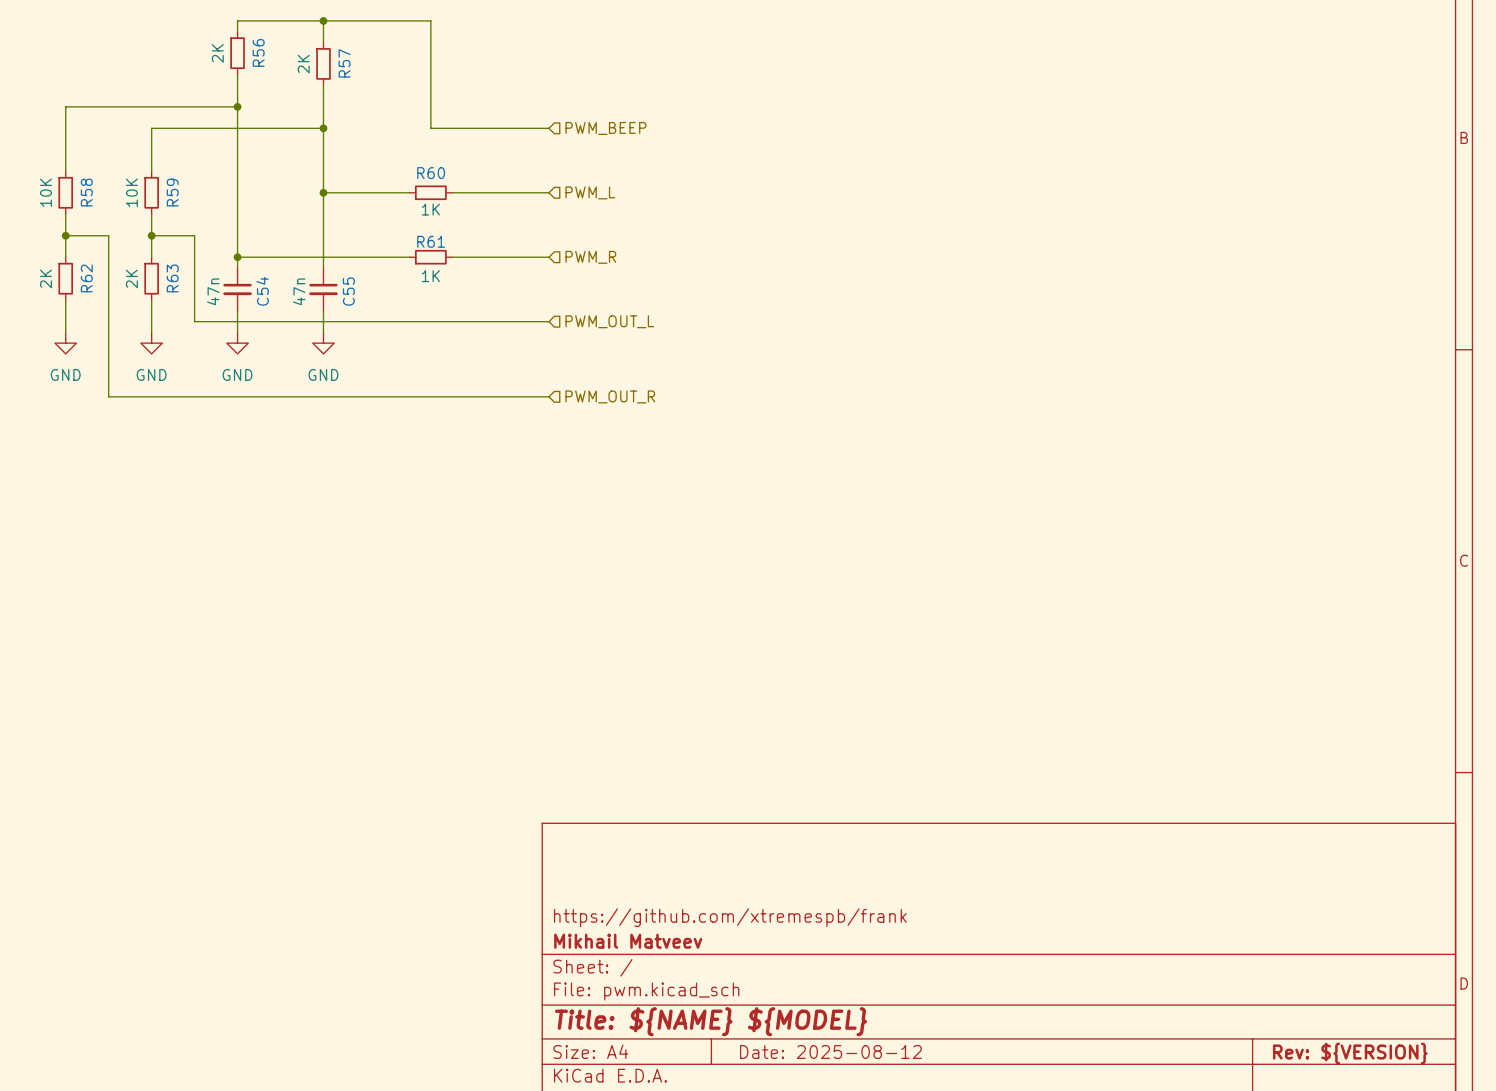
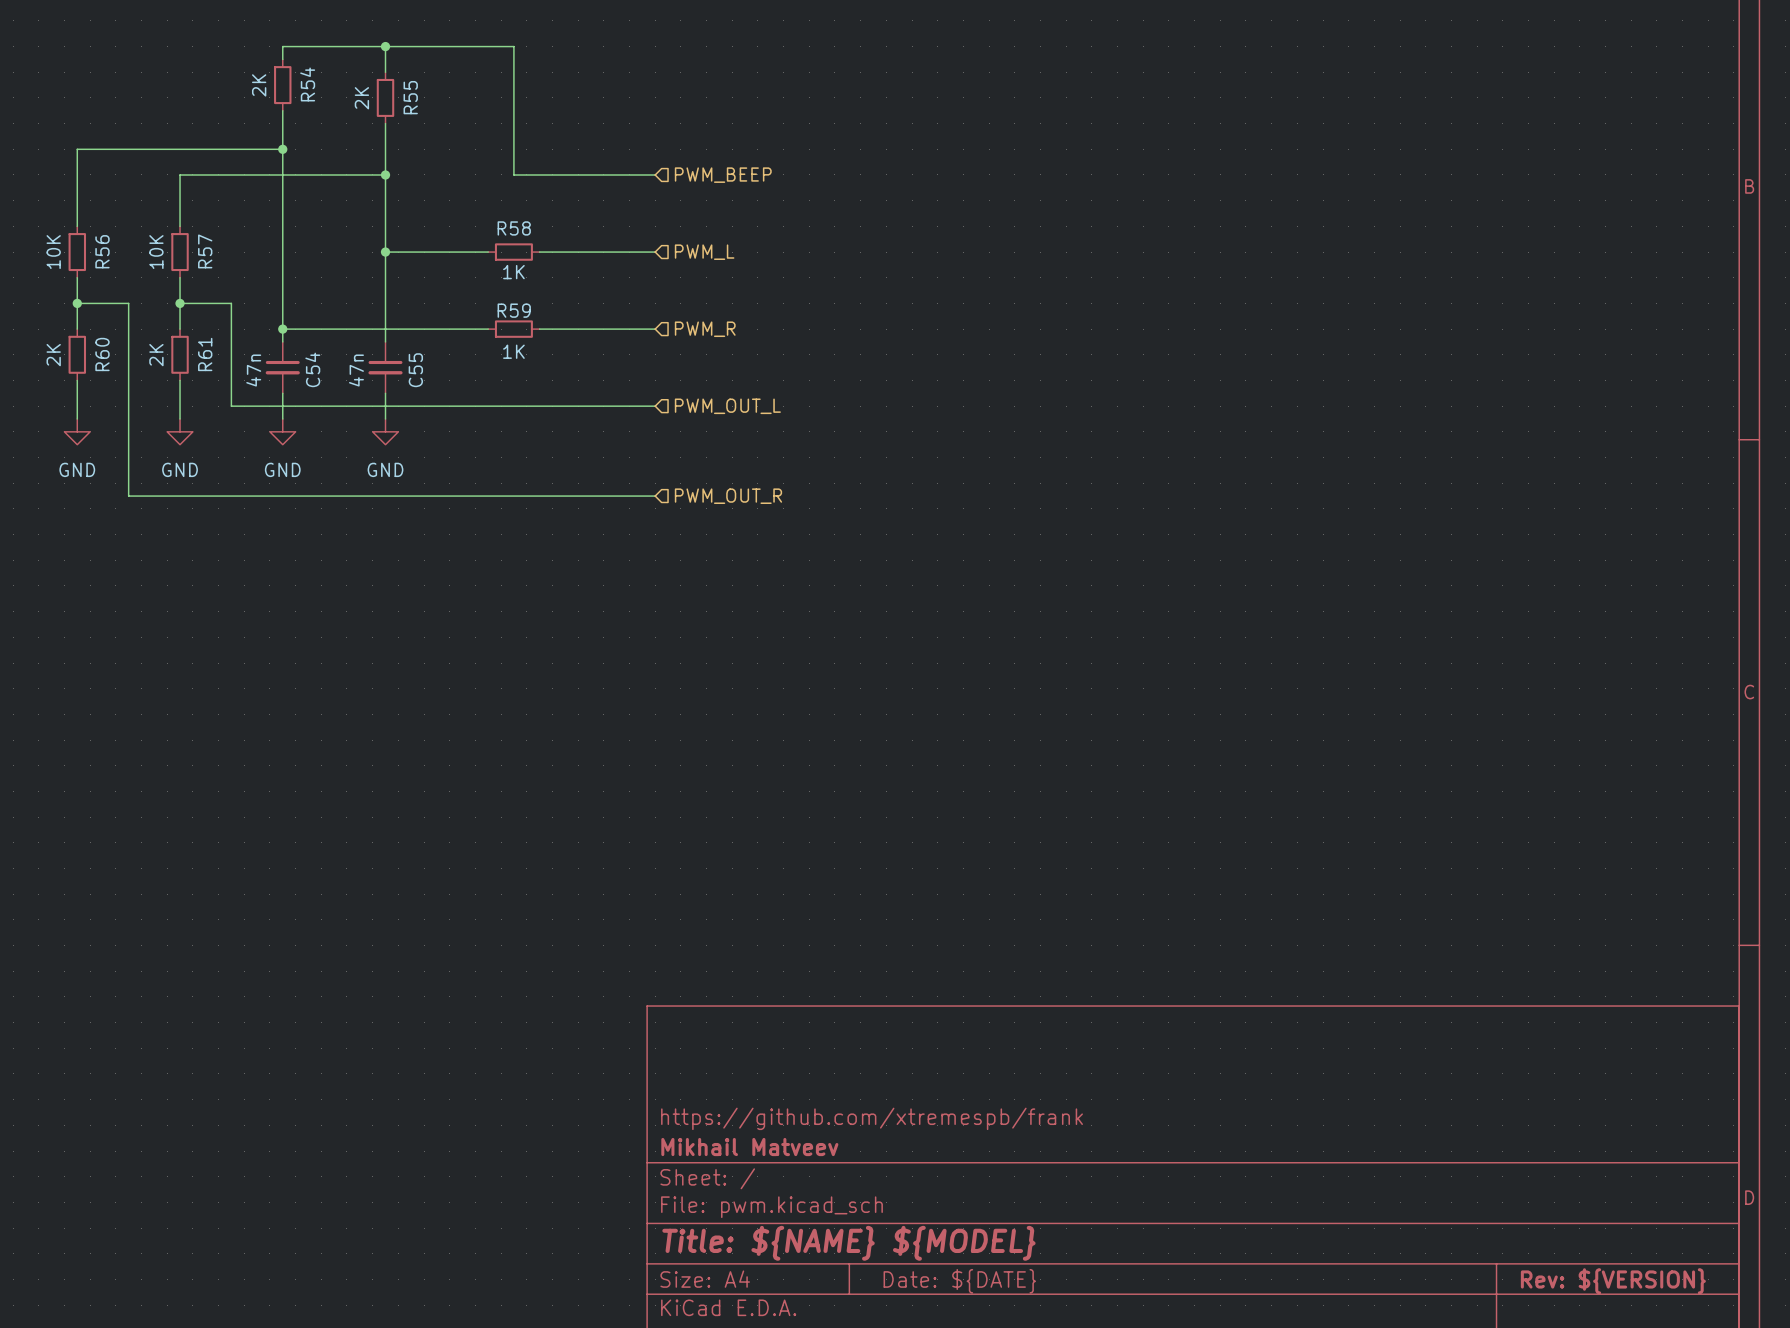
R56 name: R56 (258, 52) -> R54 (307, 84)
R57 name: R57 (344, 63) -> R55 (410, 97)
R60 name: R60 (431, 173) -> R58 (514, 228)
R58 name: R58 (86, 192) -> R56 (102, 251)
R59 name: R59 (172, 192) -> R57 (205, 251)
R61 name: R61 (431, 241) -> R59 (514, 310)
R62 name: R62 (86, 278) -> R60 (102, 354)
R63 name: R63 (172, 278) -> R61 (205, 354)
title block: Date: 2025-08-12 (830, 1052) -> Date: ${DATE} (959, 1281)

